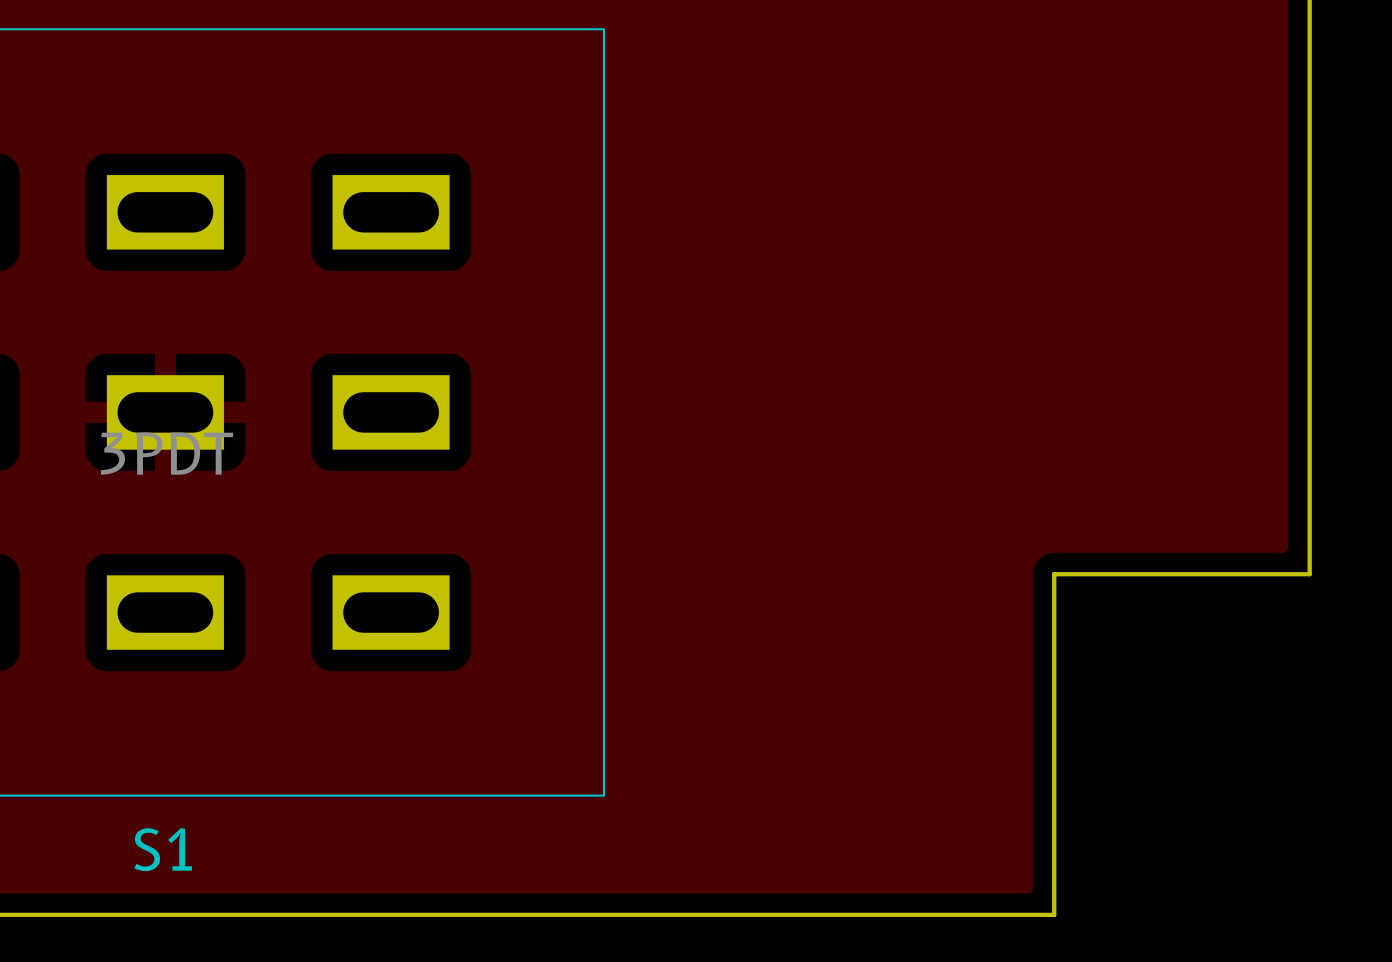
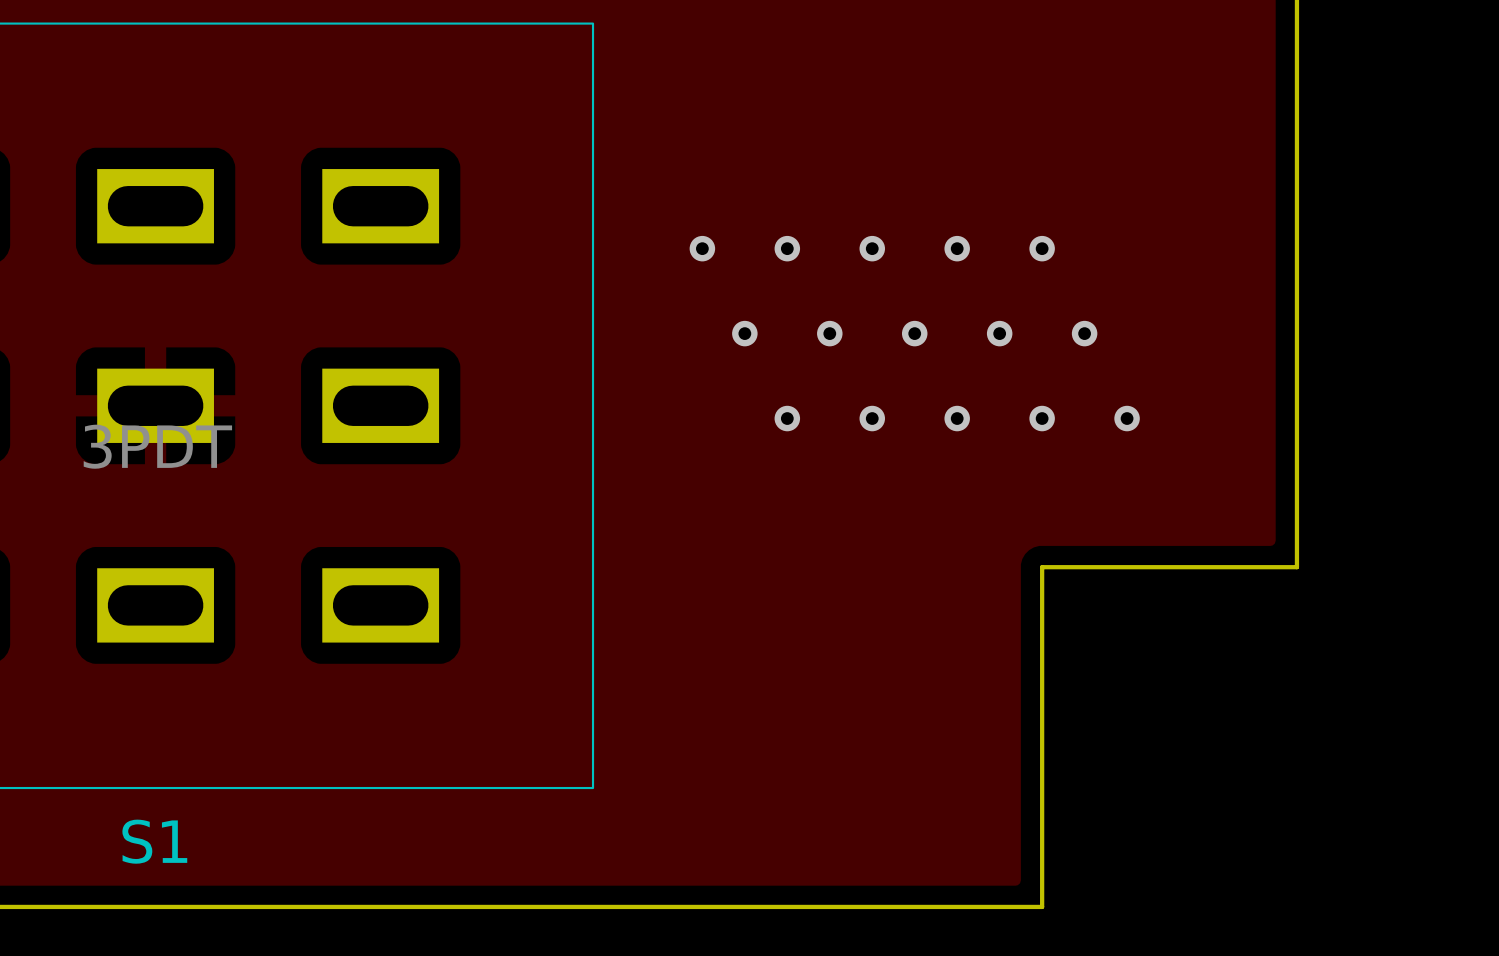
via: none -> (702, 248)
via: none -> (787, 248)
via: none -> (872, 248)
via: none -> (957, 248)
via: none -> (1042, 248)
via: none -> (744, 333)
via: none -> (829, 333)
via: none -> (914, 333)
via: none -> (999, 333)
via: none -> (1084, 333)
via: none -> (787, 418)
via: none -> (872, 418)
via: none -> (957, 418)
via: none -> (1042, 418)
via: none -> (1127, 418)

